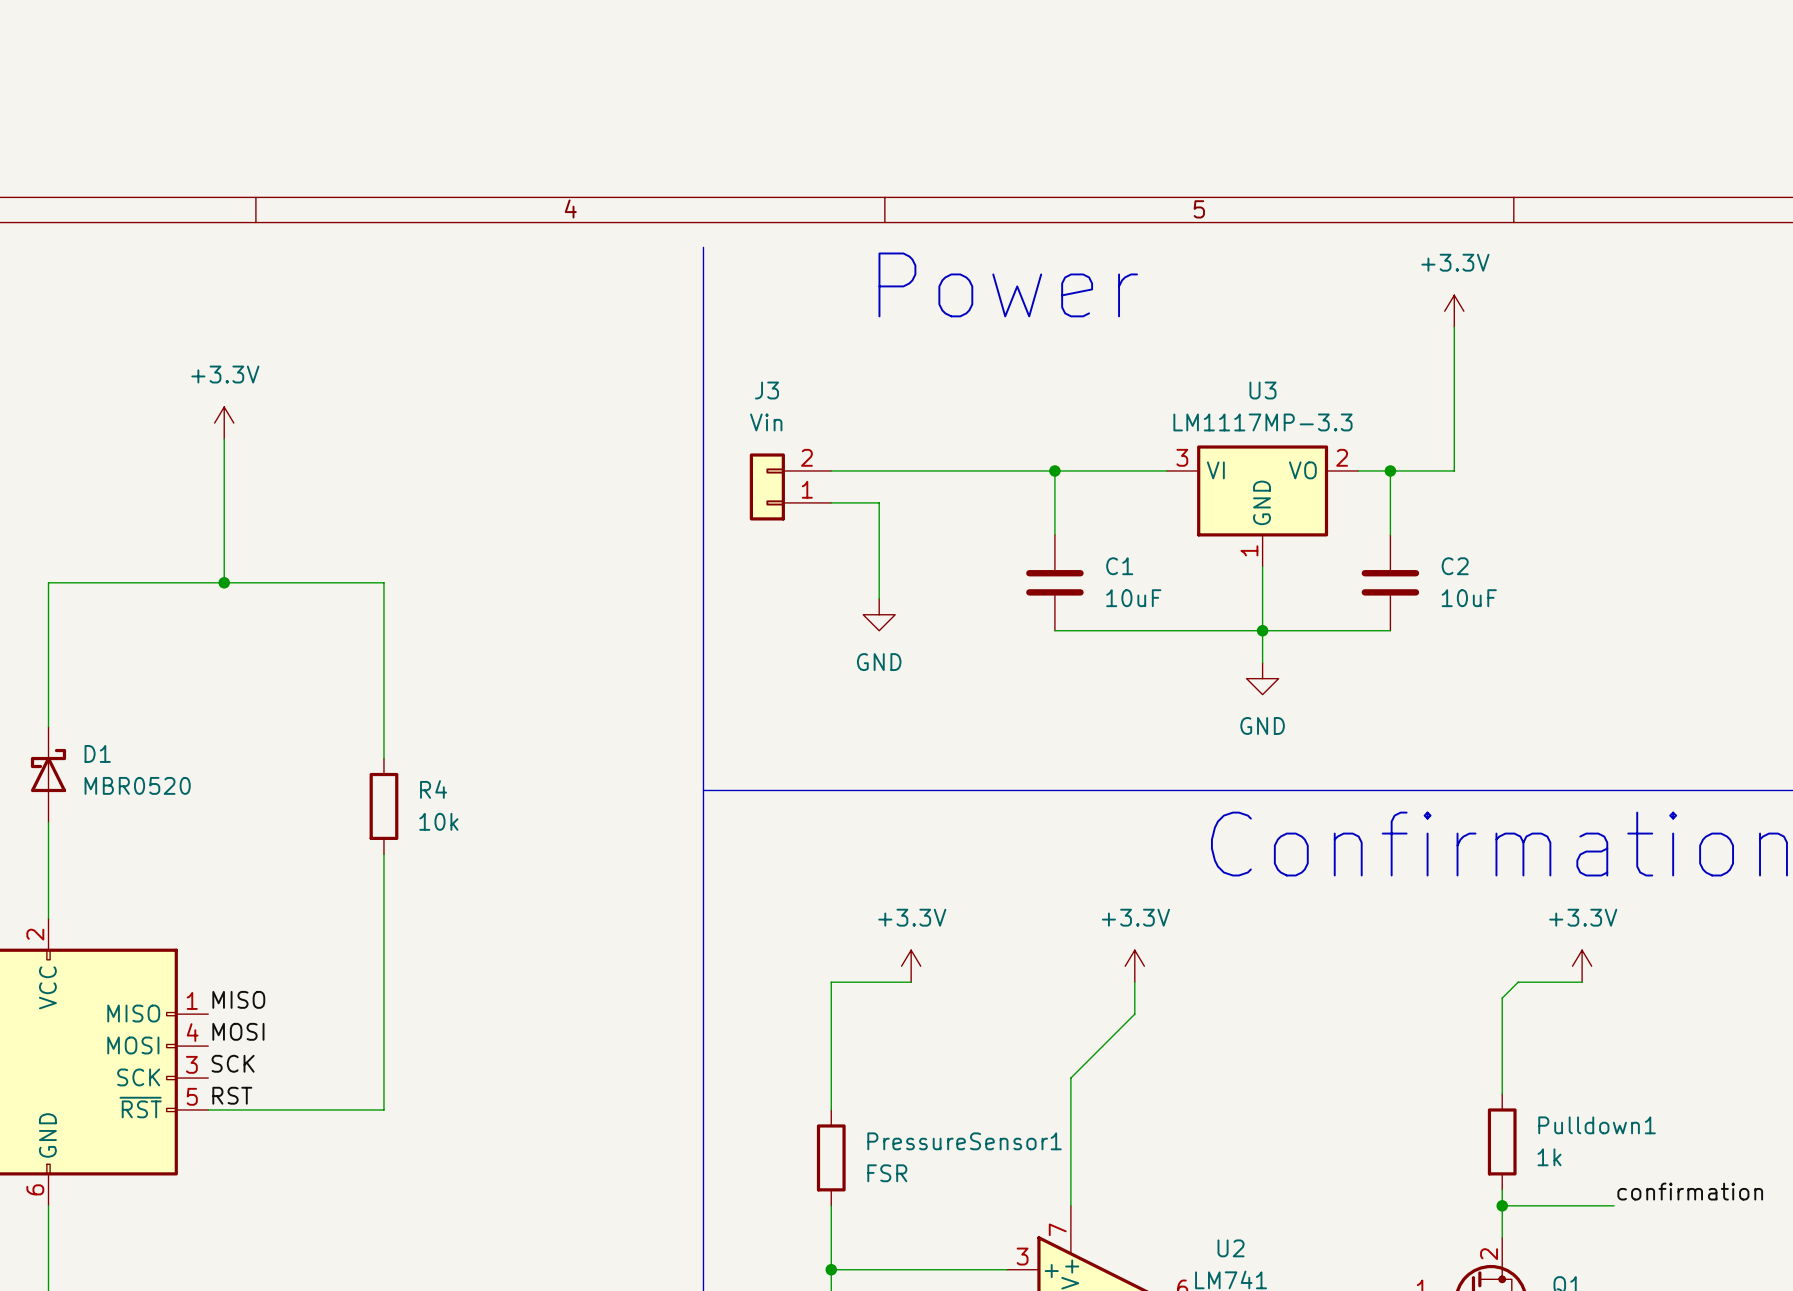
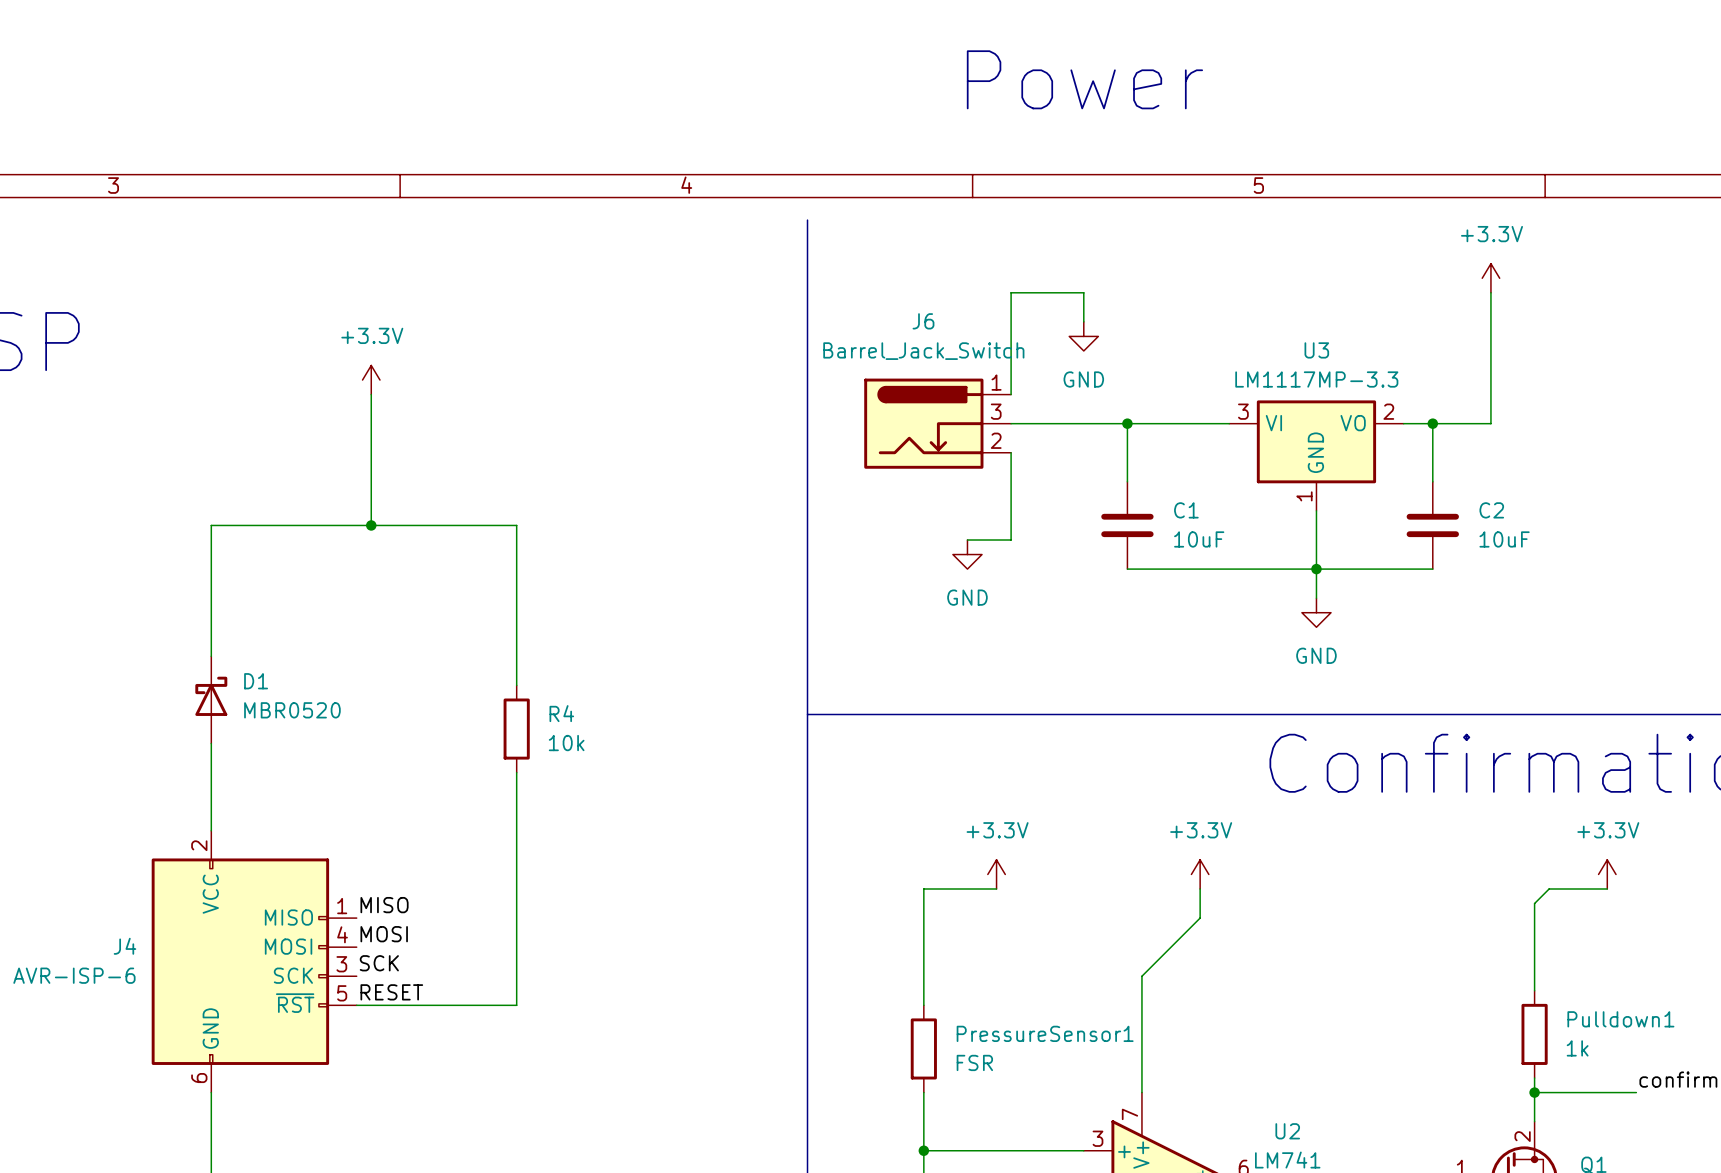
text position: Power (1008, 284) -> Power (1084, 79)
wire: none -> (1083, 321) (1083, 292) (1011, 292) (1011, 394)
power symbol: none -> GND (1083, 336)
J6: none -> Barrel_Jack_Switch (937, 423)
J3: Vin (790, 486) -> none
wire: (831, 502) (879, 502) (879, 598) -> (1011, 452) (1011, 540) (967, 540)
label: RST (232, 1095) -> RESET (391, 992)

